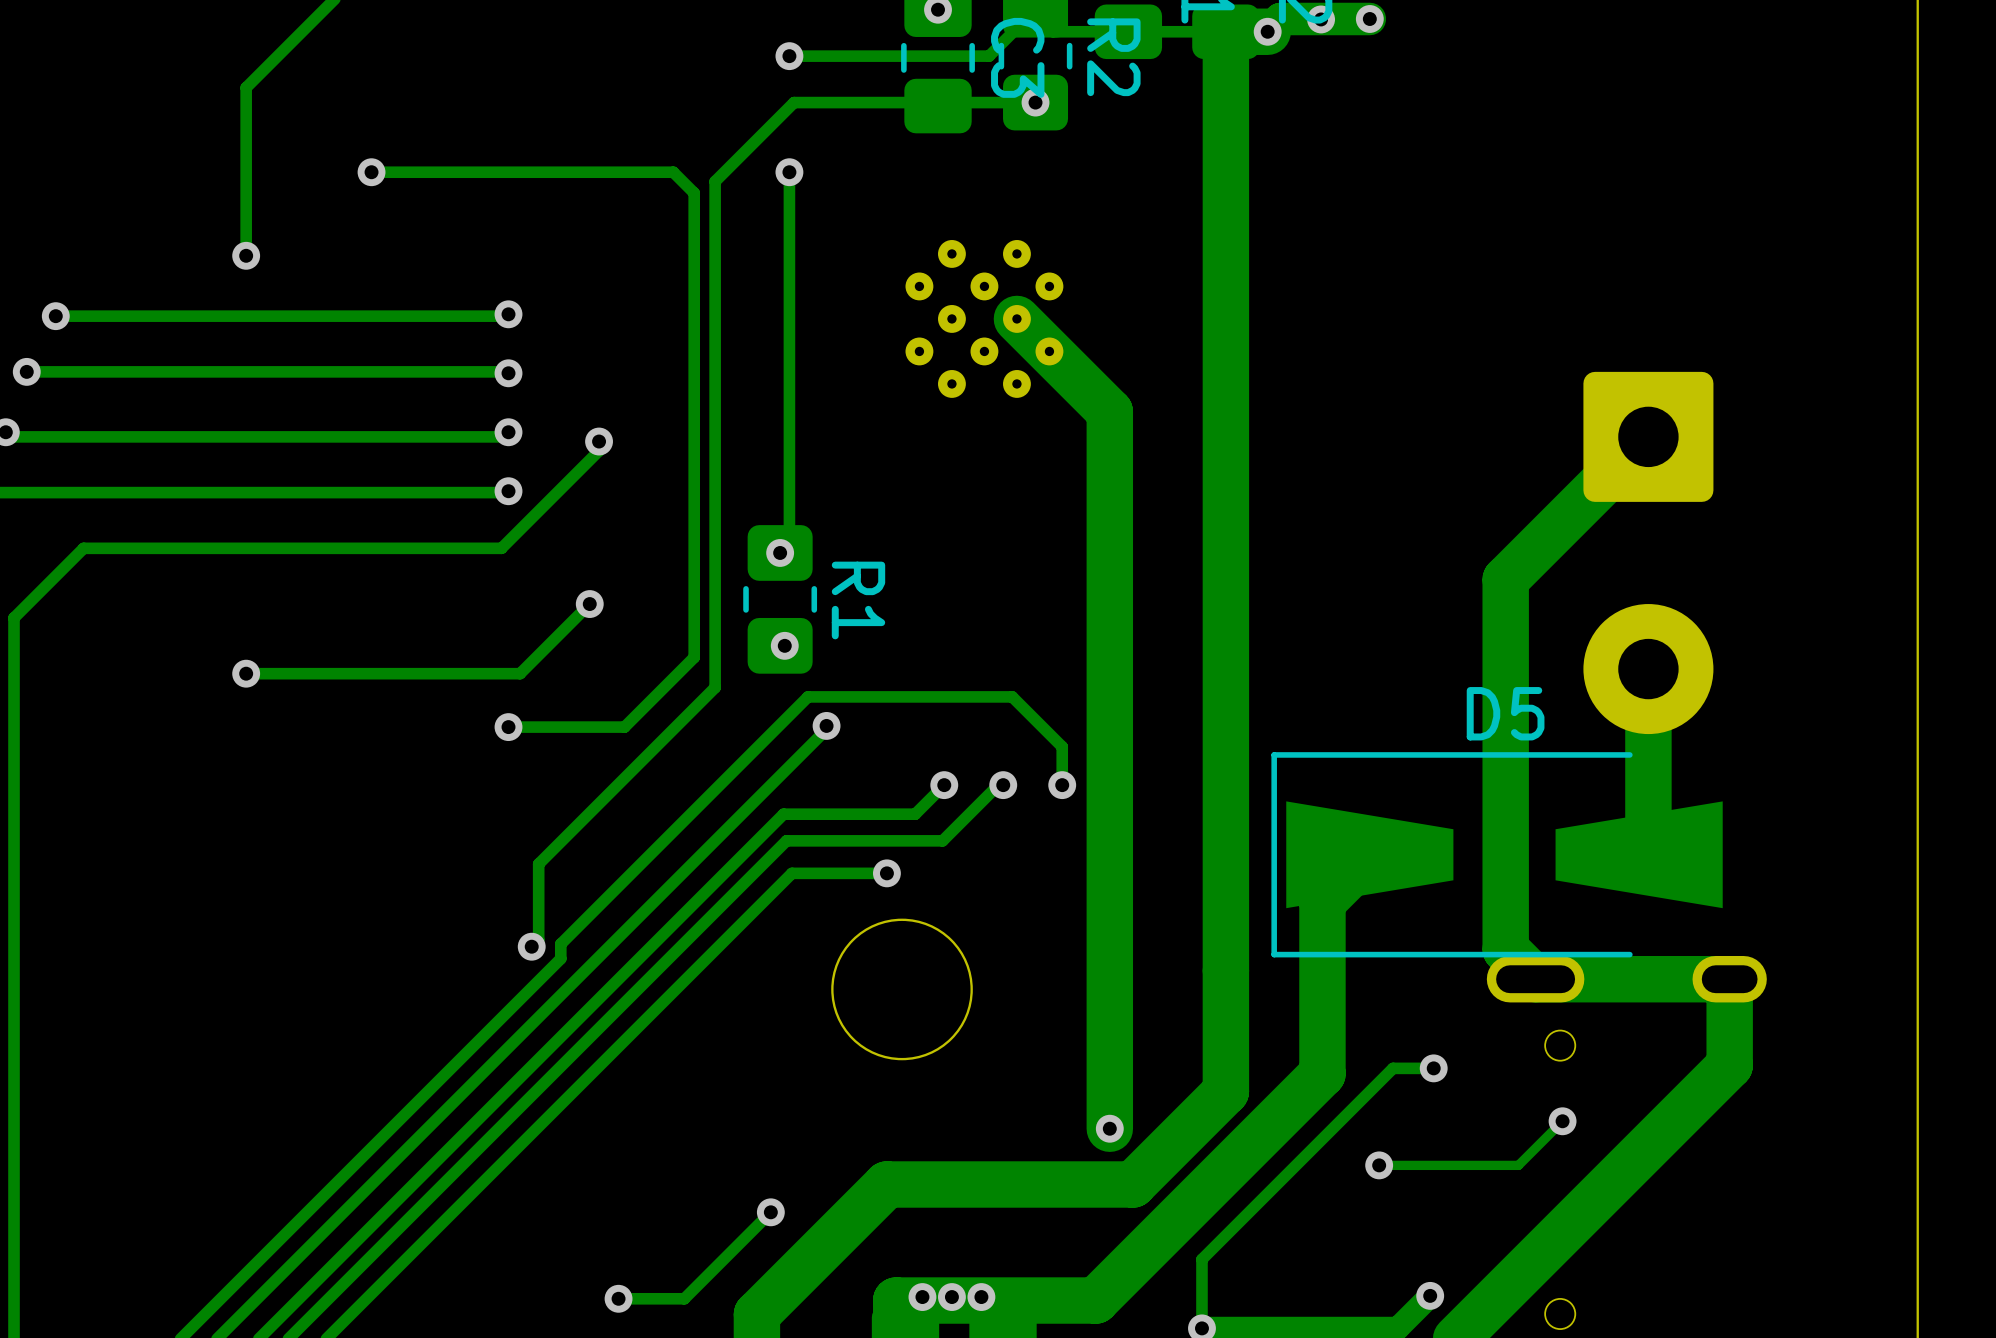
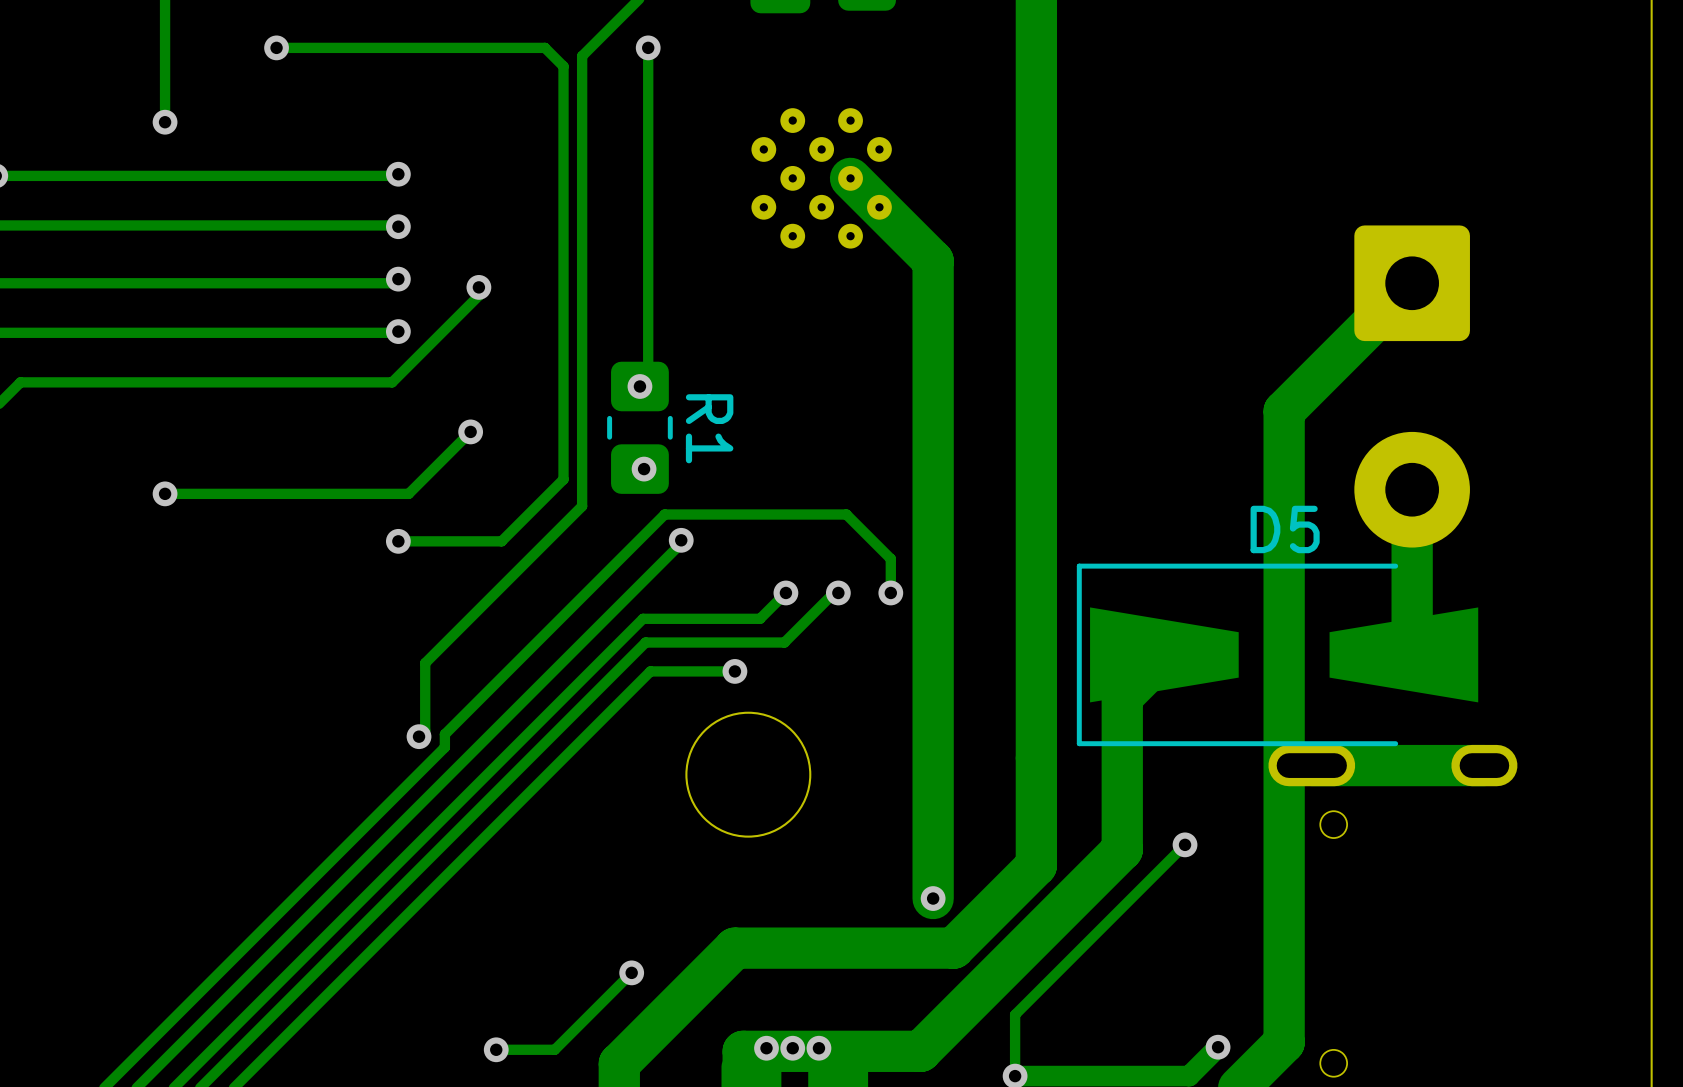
track: (1505, 579) (1505, 949) (1535, 979) -> (1285, 410) (1284, 1042)
track: (1729, 979) (1729, 1065) (1504, 1290) -> none
track: (1433, 1068) (1393, 1068) -> none
via position: (1433, 1068) -> (1185, 844)
track: (1562, 1121) (1518, 1165) (1379, 1165) -> none
via: (1562, 1121) -> none
via: (1379, 1165) -> none

